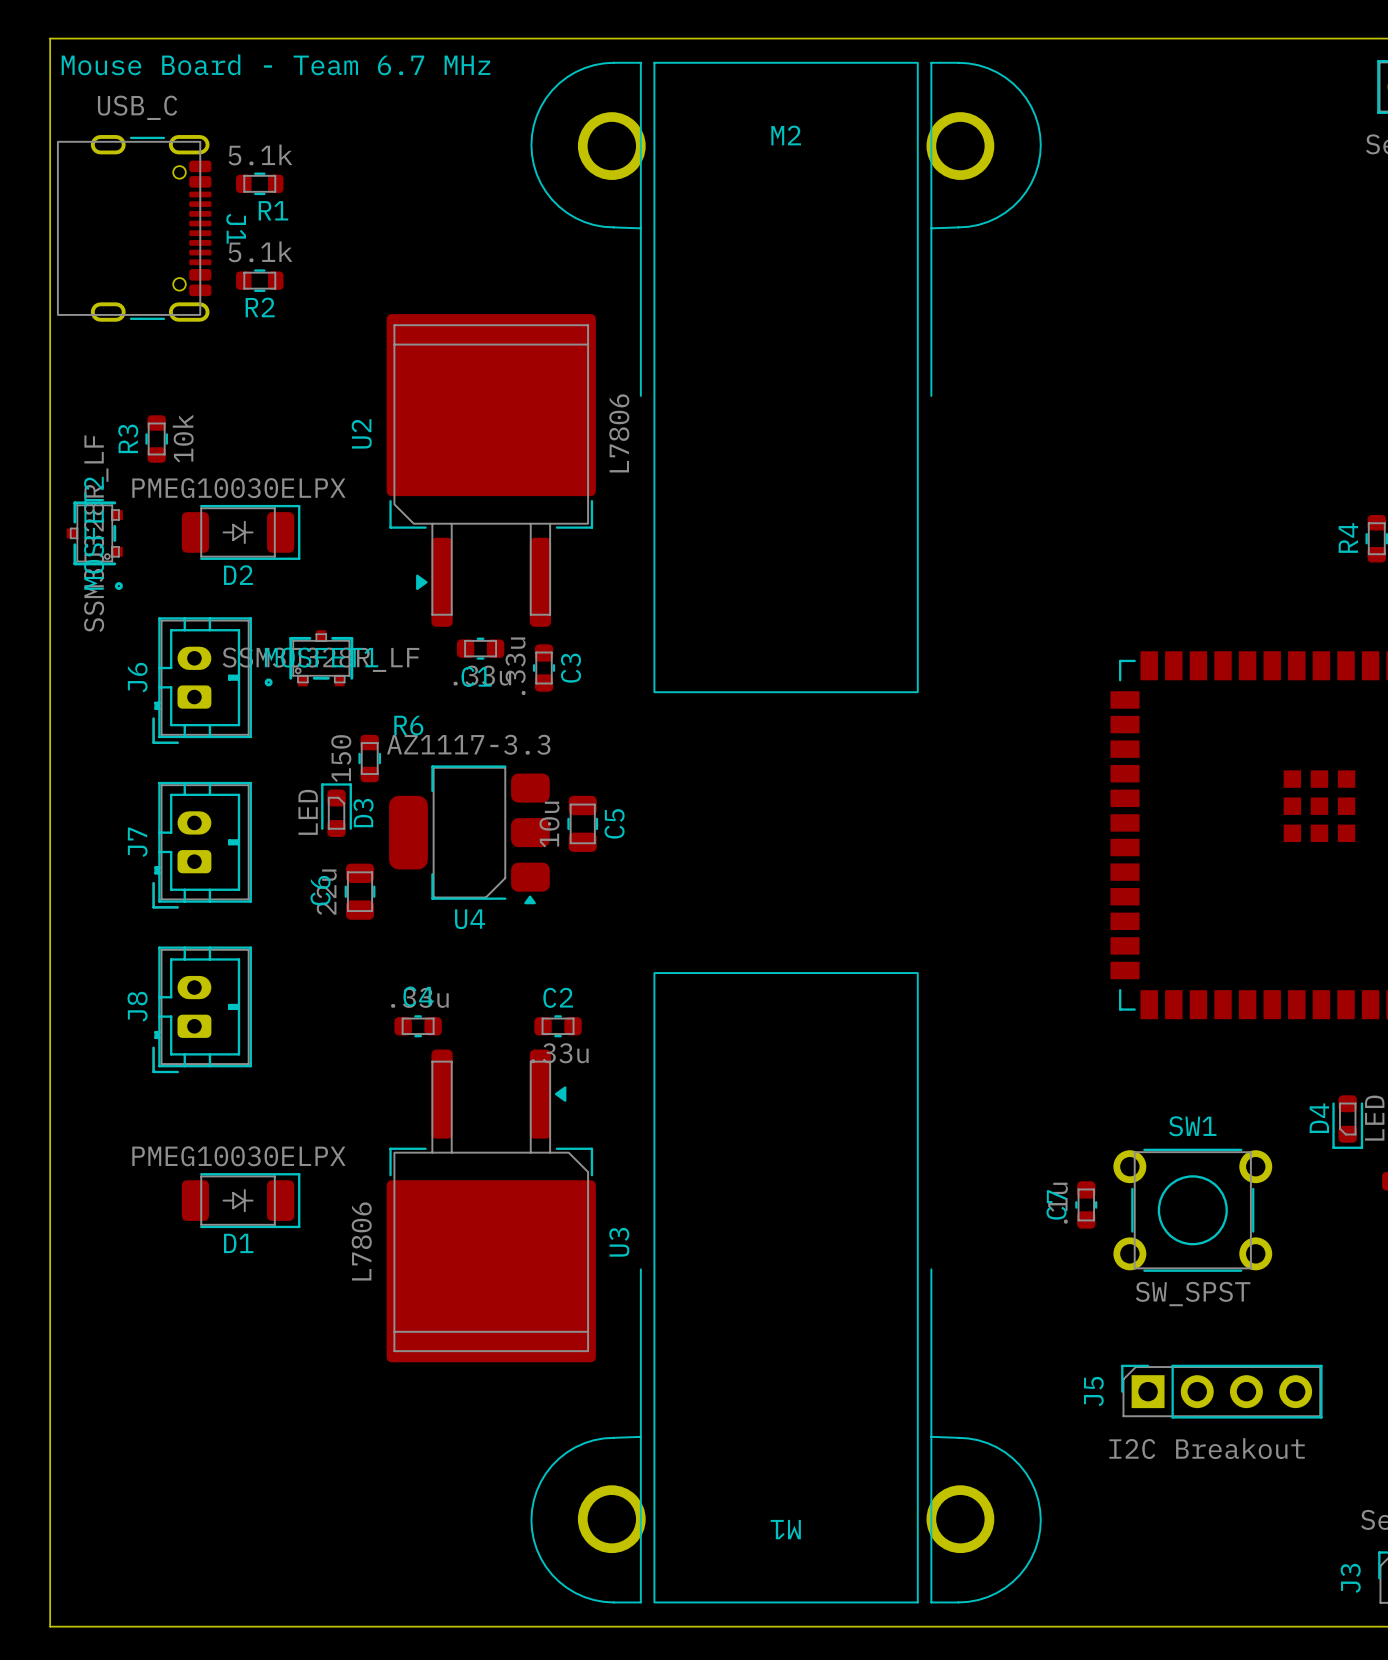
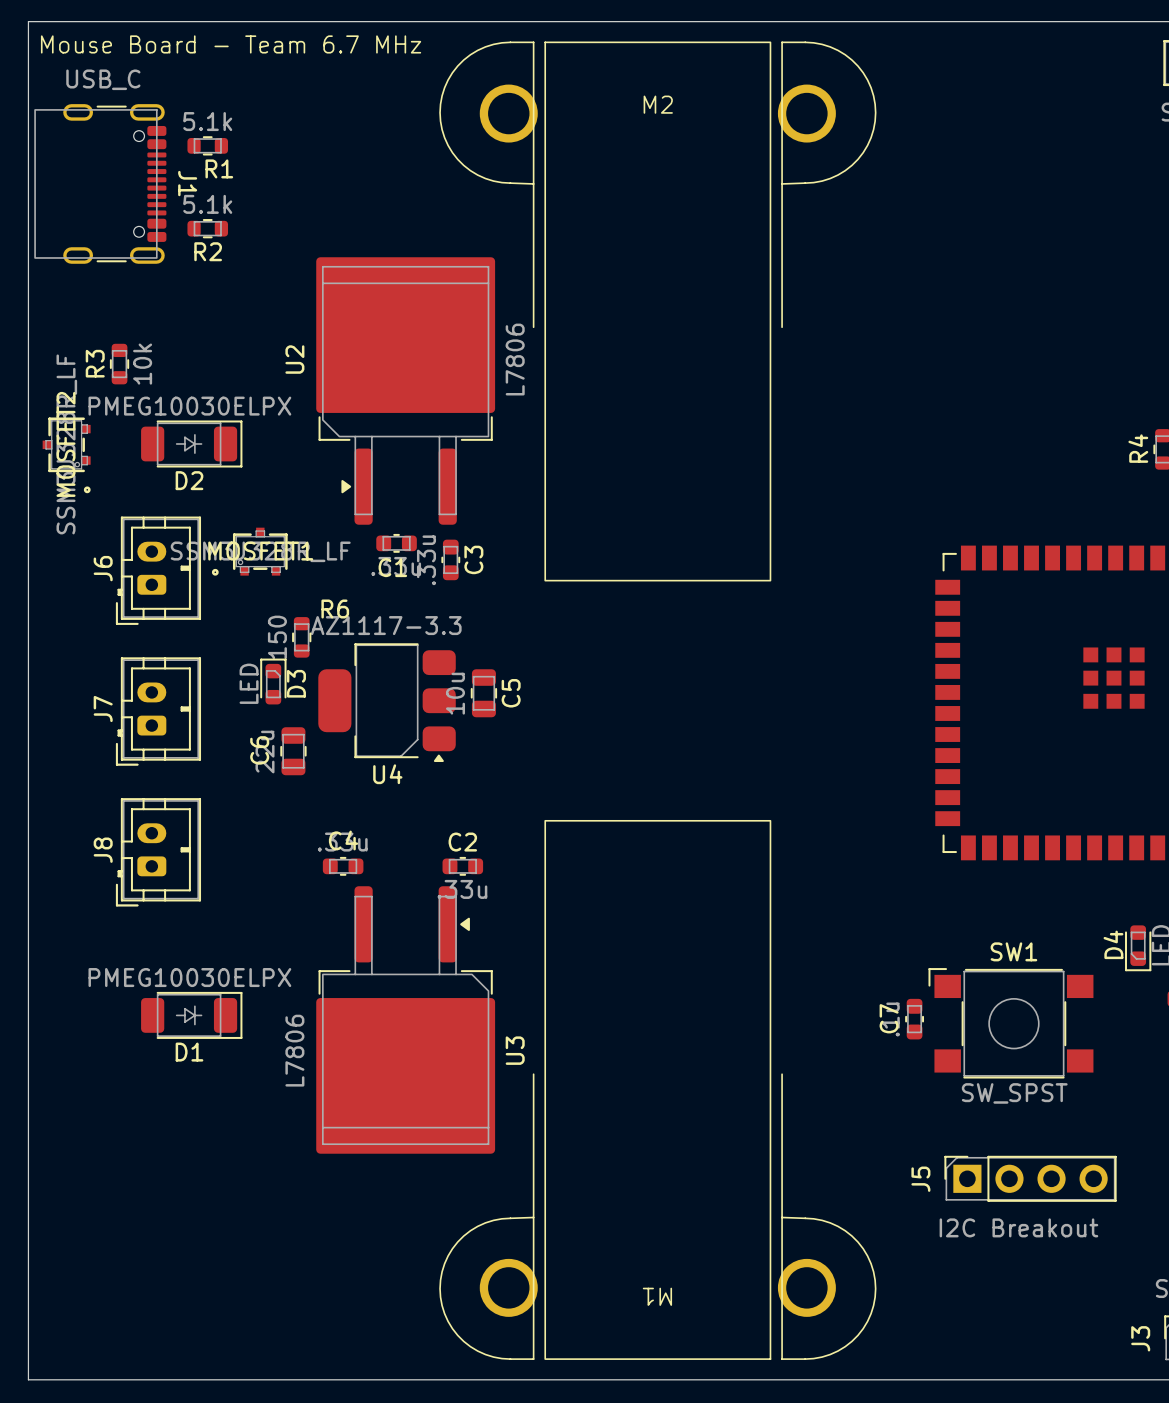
SW1 footprint: [1113, 1148, 1273, 1272] -> [928, 968, 1094, 1079]

